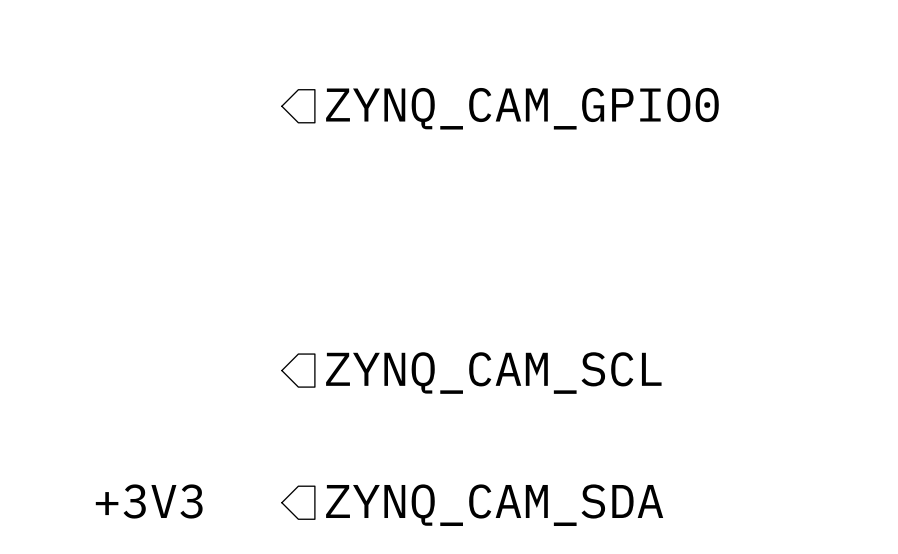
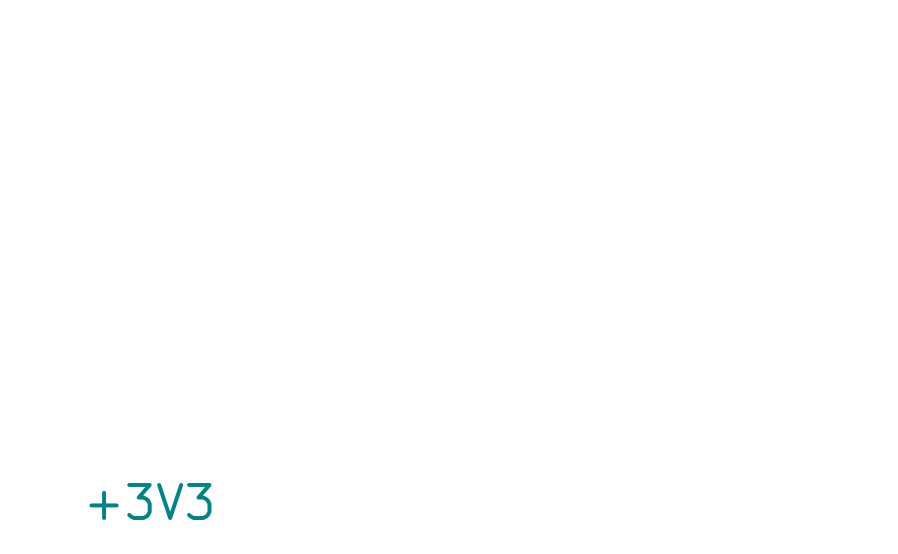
hierarchical label: ZYNQ_CAM_GPIO0 (522, 108) -> none
hierarchical label: ZYNQ_CAM_SCL (493, 373) -> none
hierarchical label: ZYNQ_CAM_SDA (494, 505) -> none

